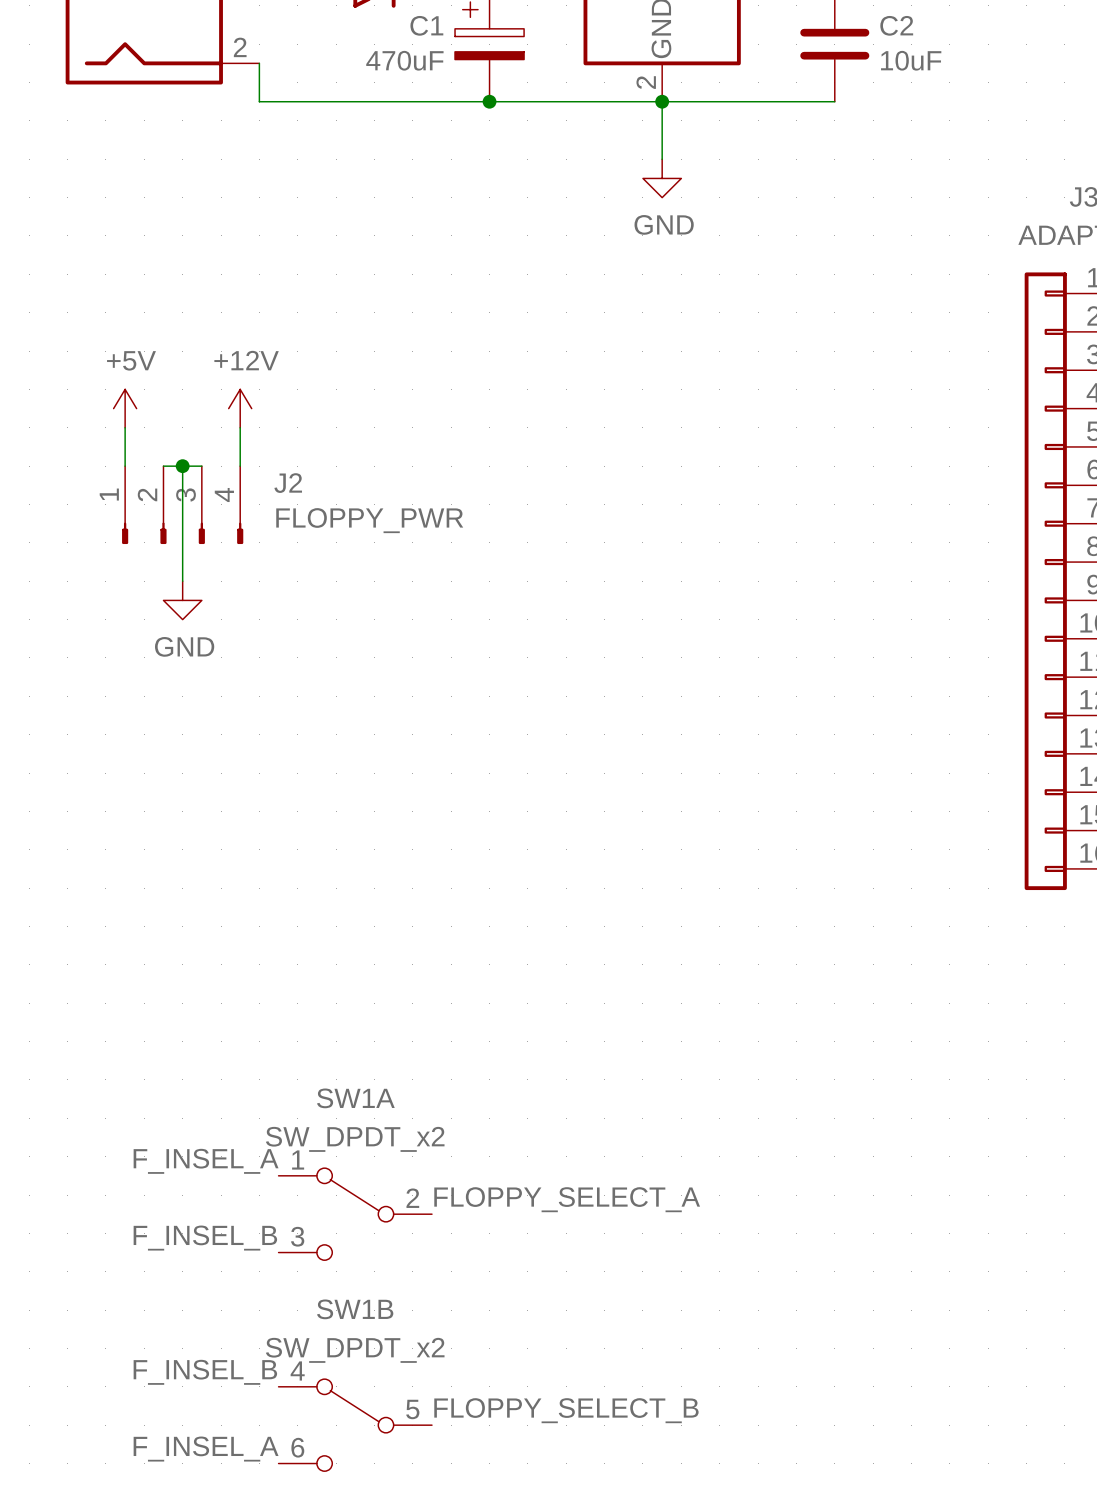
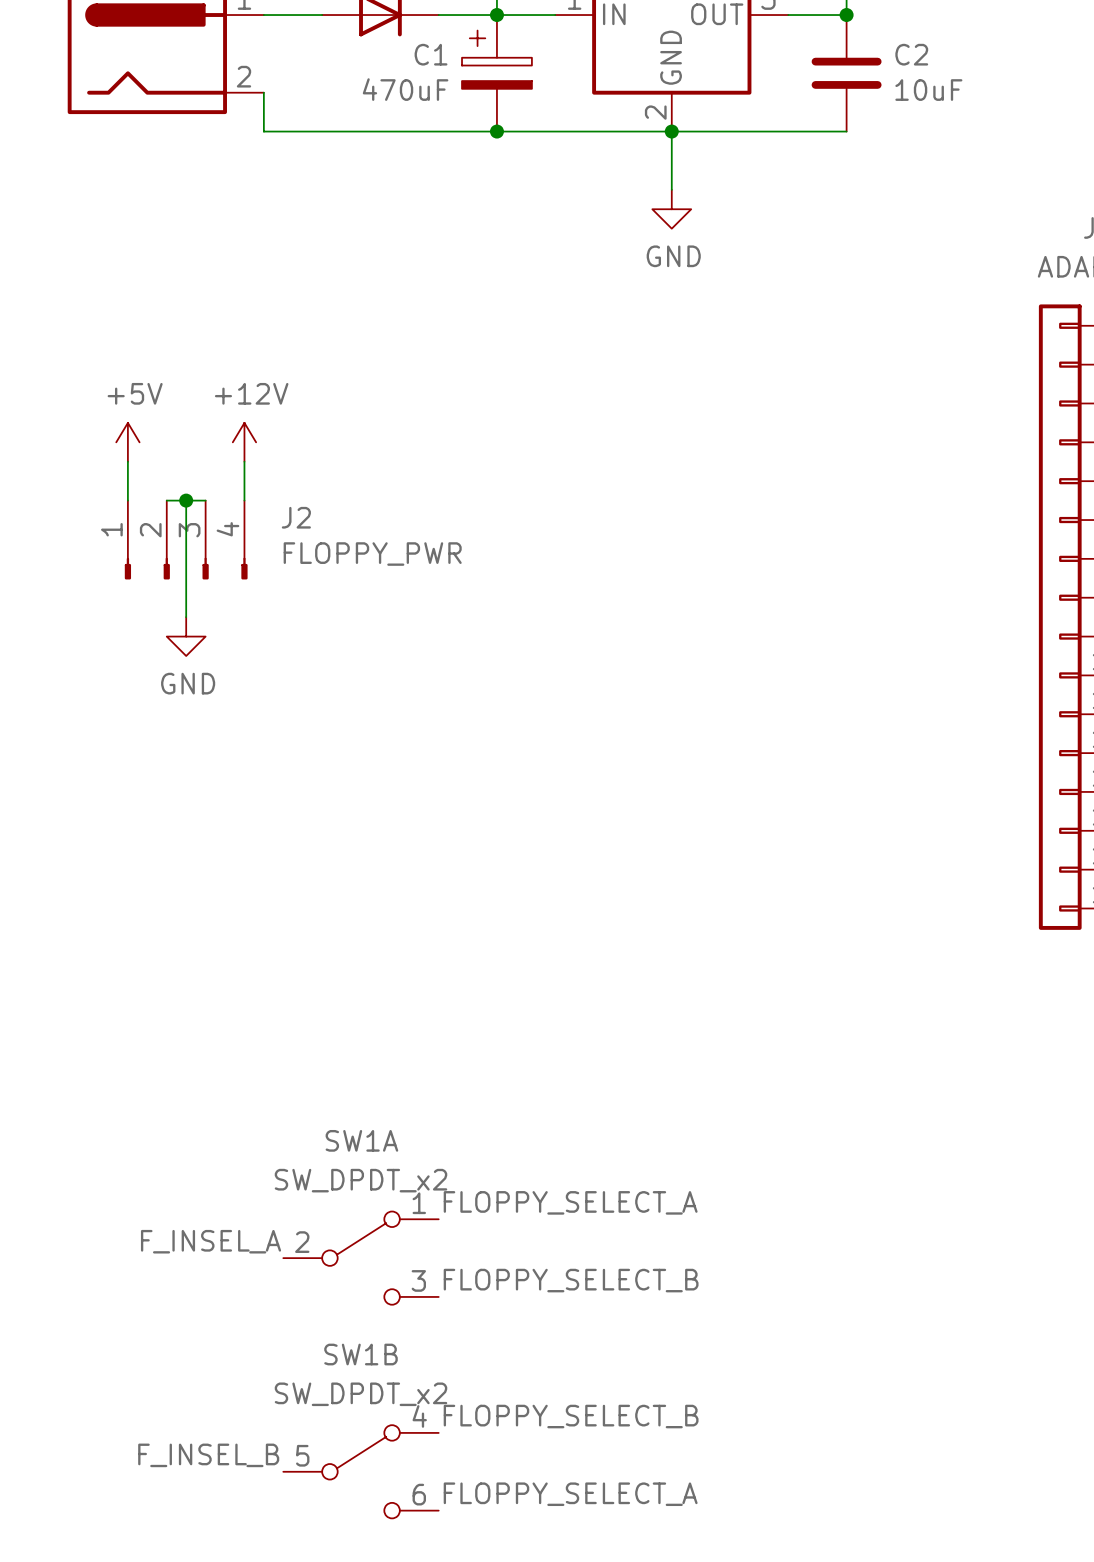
label position: F_INSEL_A (206, 1161) -> F_INSEL_A (211, 1241)
label position: FLOPPY_SELECT_A (567, 1199) -> FLOPPY_SELECT_A (570, 1202)
SW1A flip: as is (355, 1214) -> left-right (361, 1258)
label: F_INSEL_B (205, 1238) -> none
label: none -> FLOPPY_SELECT_B (571, 1280)
label position: F_INSEL_B (205, 1372) -> F_INSEL_B (208, 1455)
label position: FLOPPY_SELECT_B (566, 1410) -> FLOPPY_SELECT_B (571, 1416)
SW1B flip: as is (355, 1425) -> left-right (361, 1471)
label: F_INSEL_A (206, 1449) -> none
label: none -> FLOPPY_SELECT_A (570, 1494)

